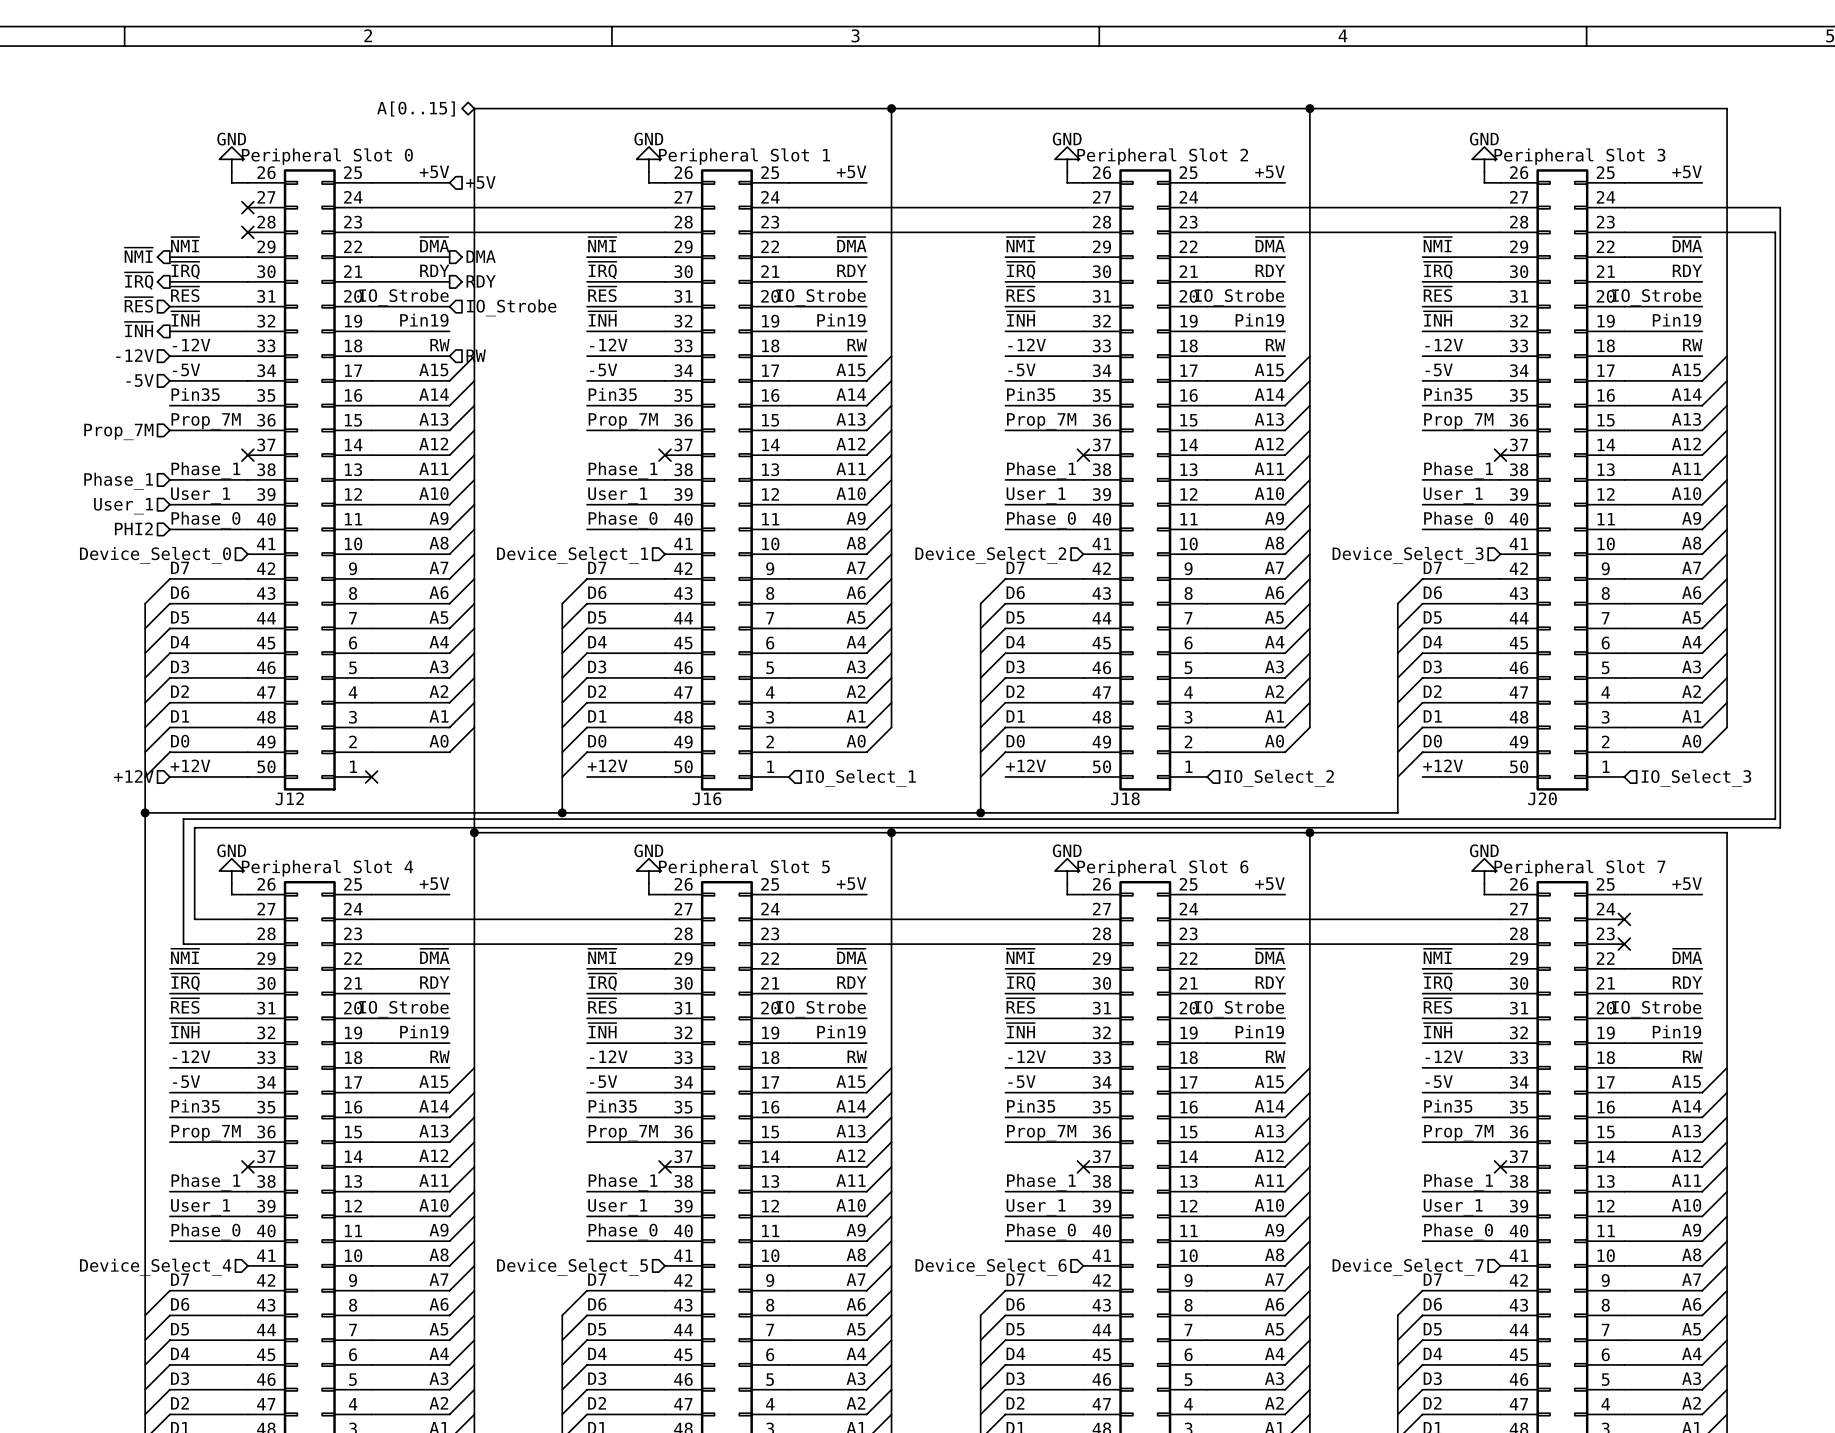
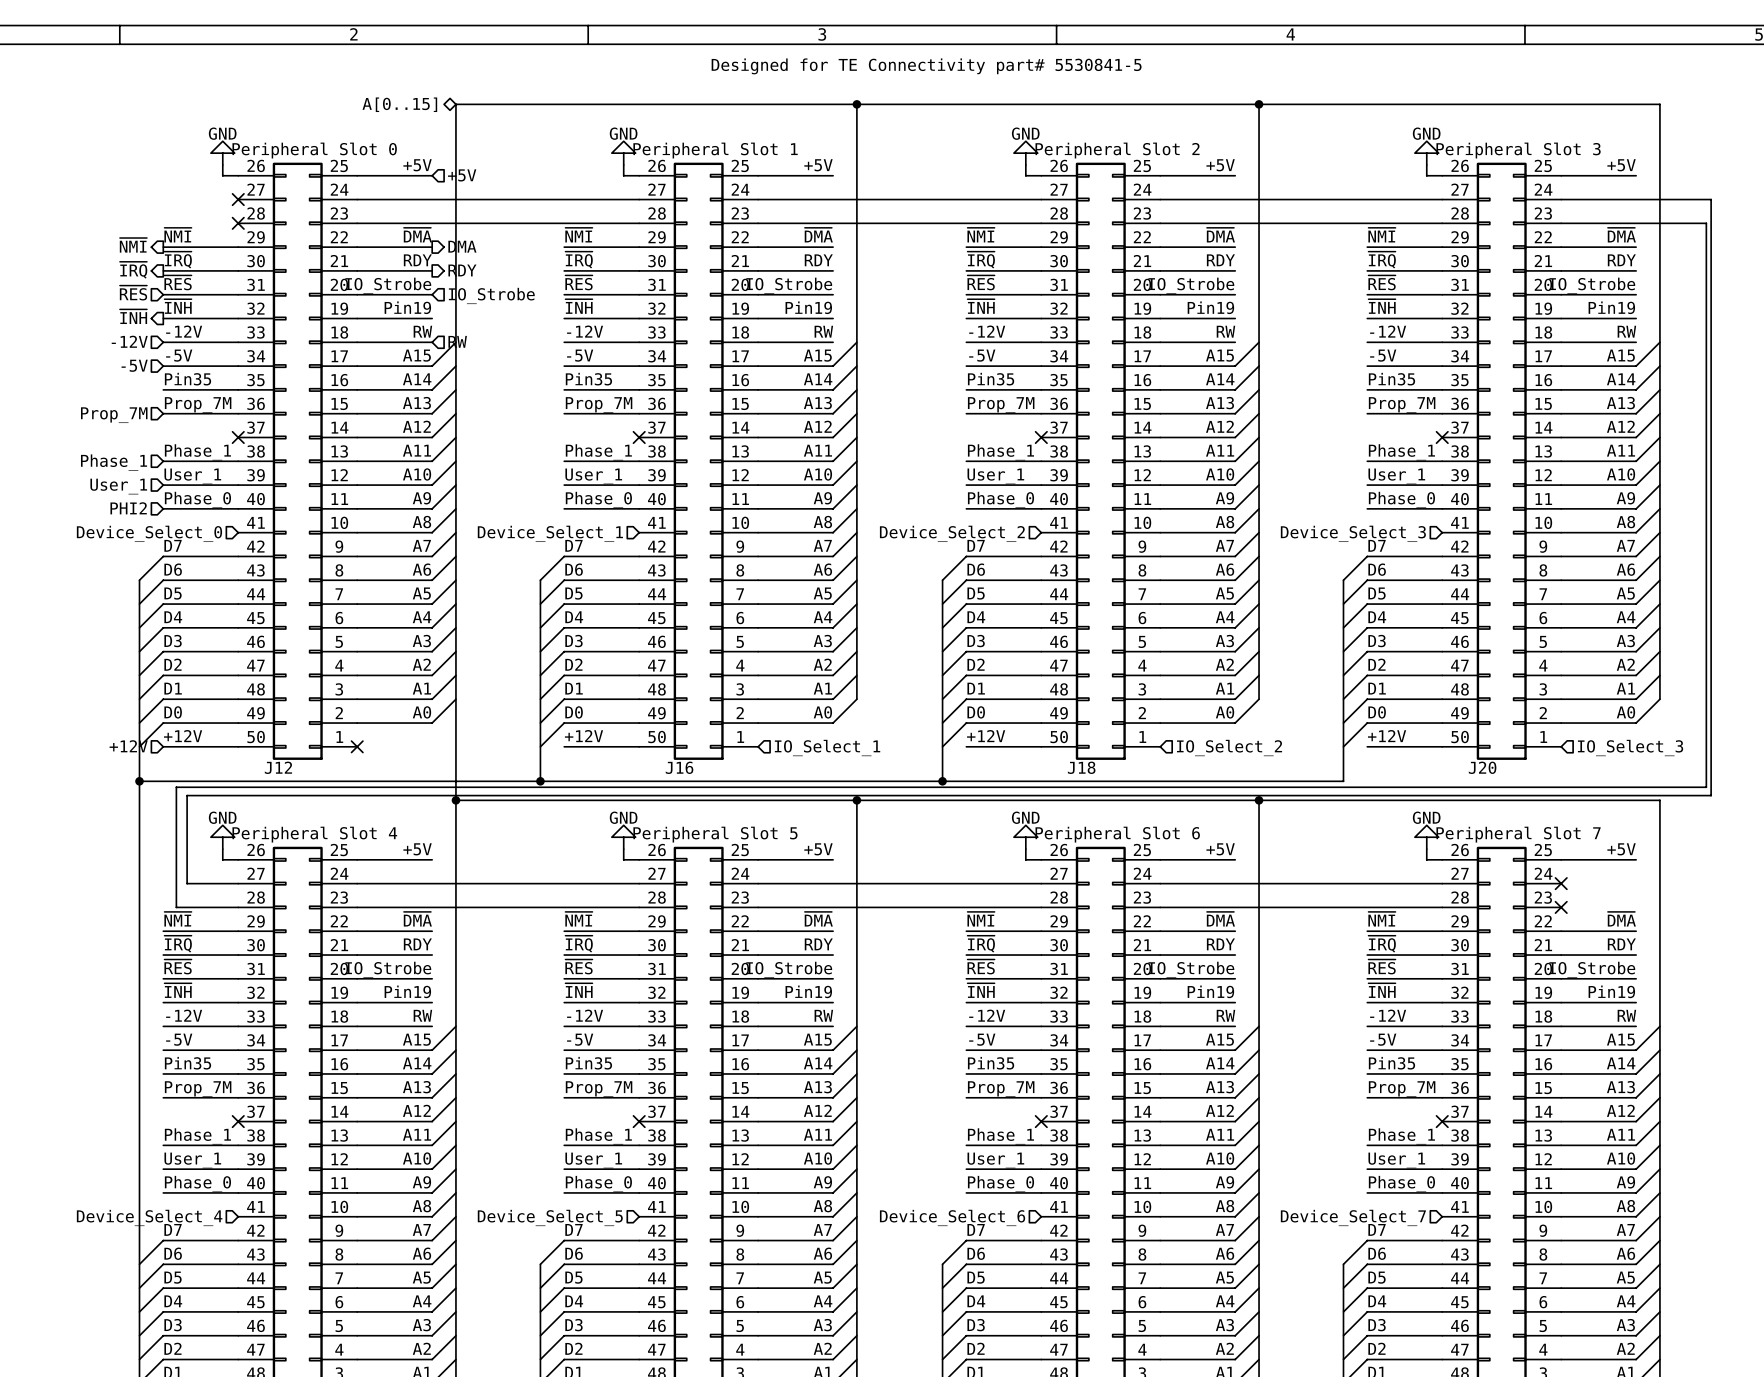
text: none -> Designed for TE Connectivity part# 5530841-5 (926, 66)

